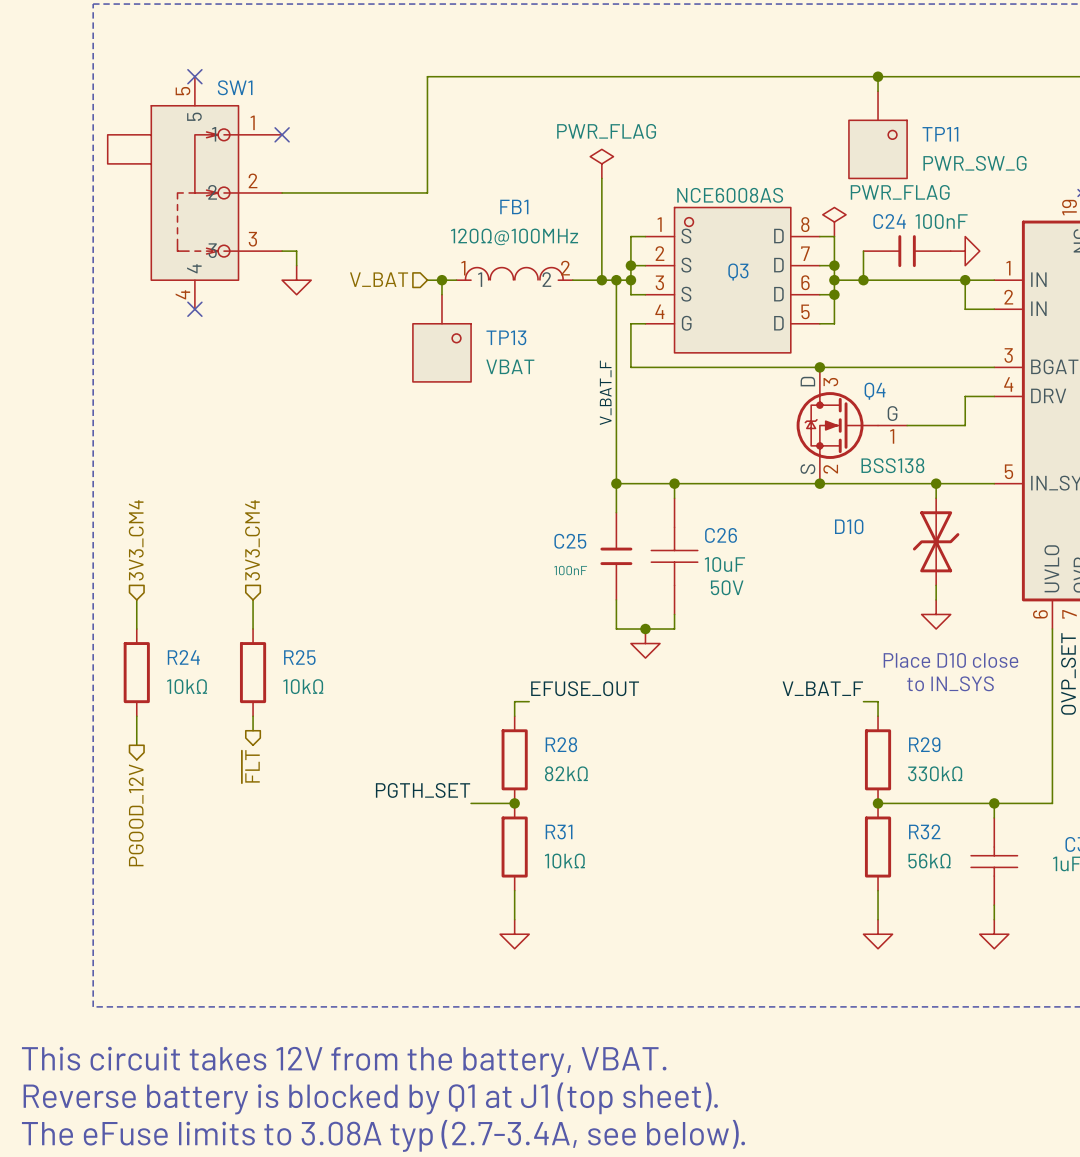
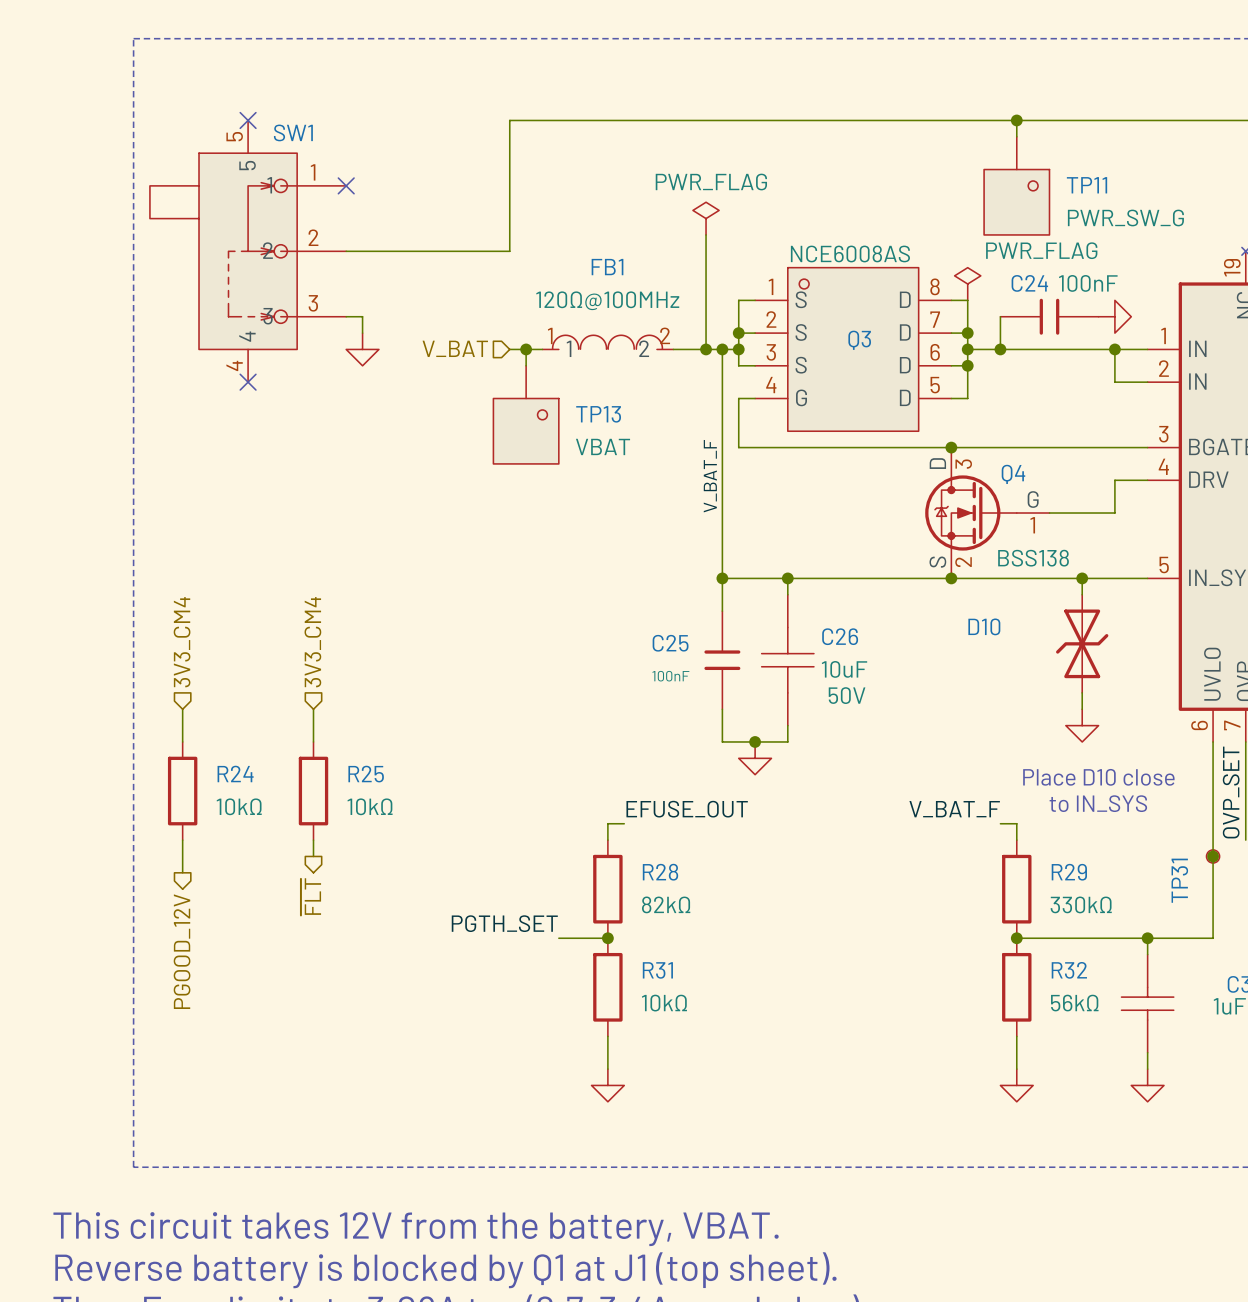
junction: none -> (1213, 856)
TP31: none -> (1213, 856)

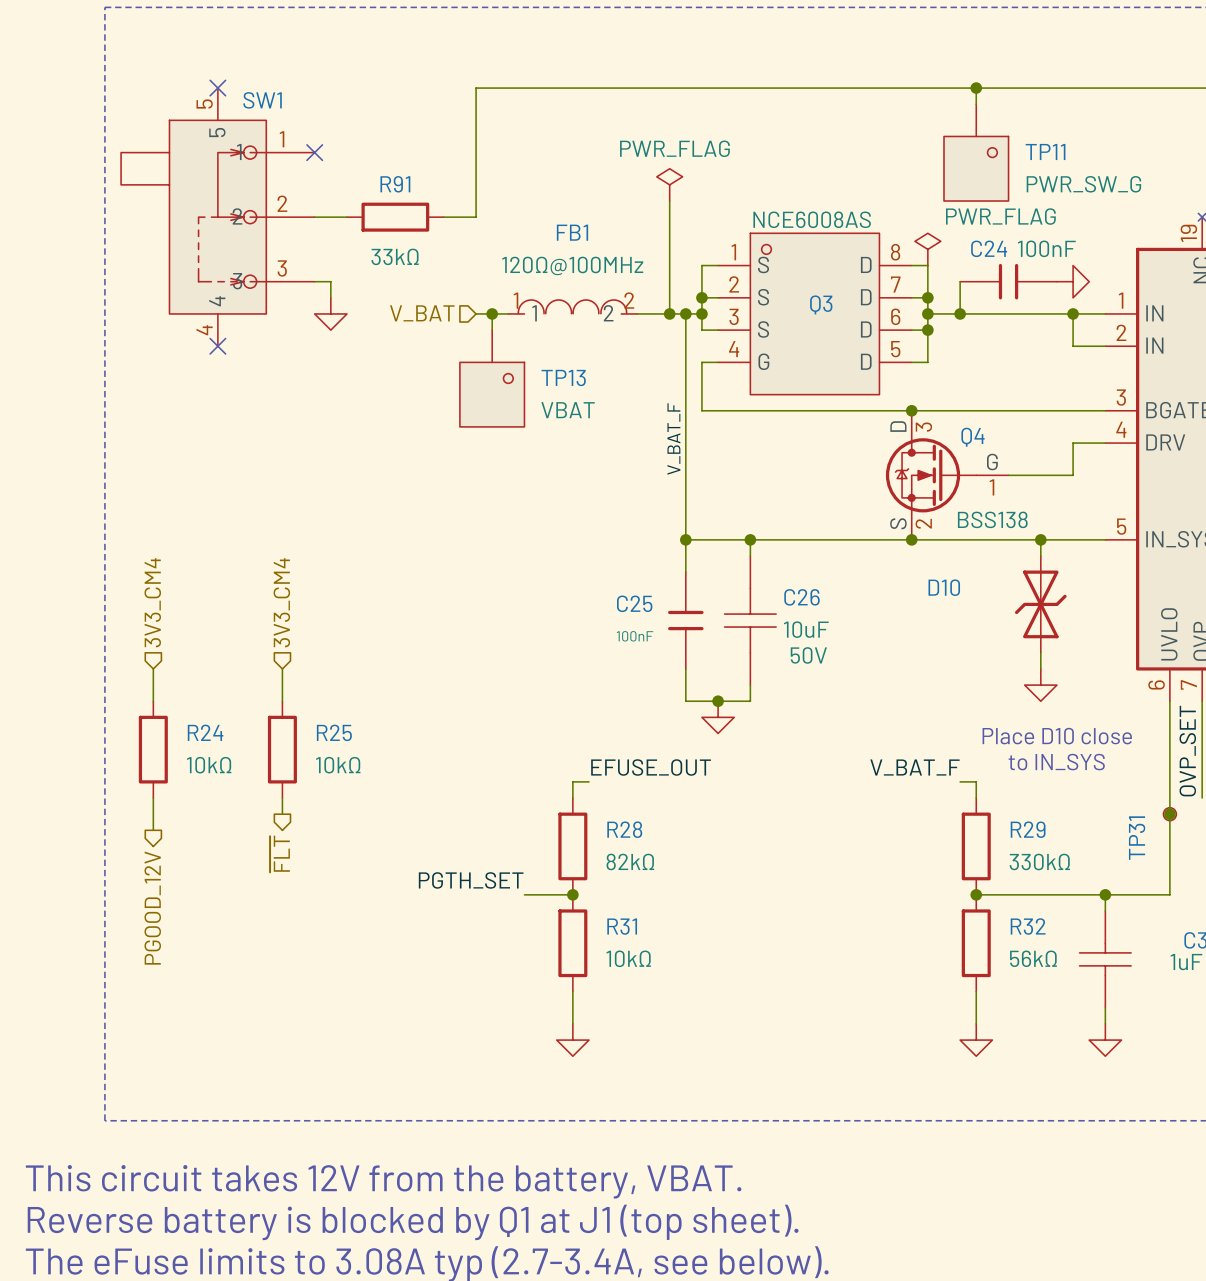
wire: (378, 251) (477, 251) -> none
R91: none -> 33kΩ (395, 217)

